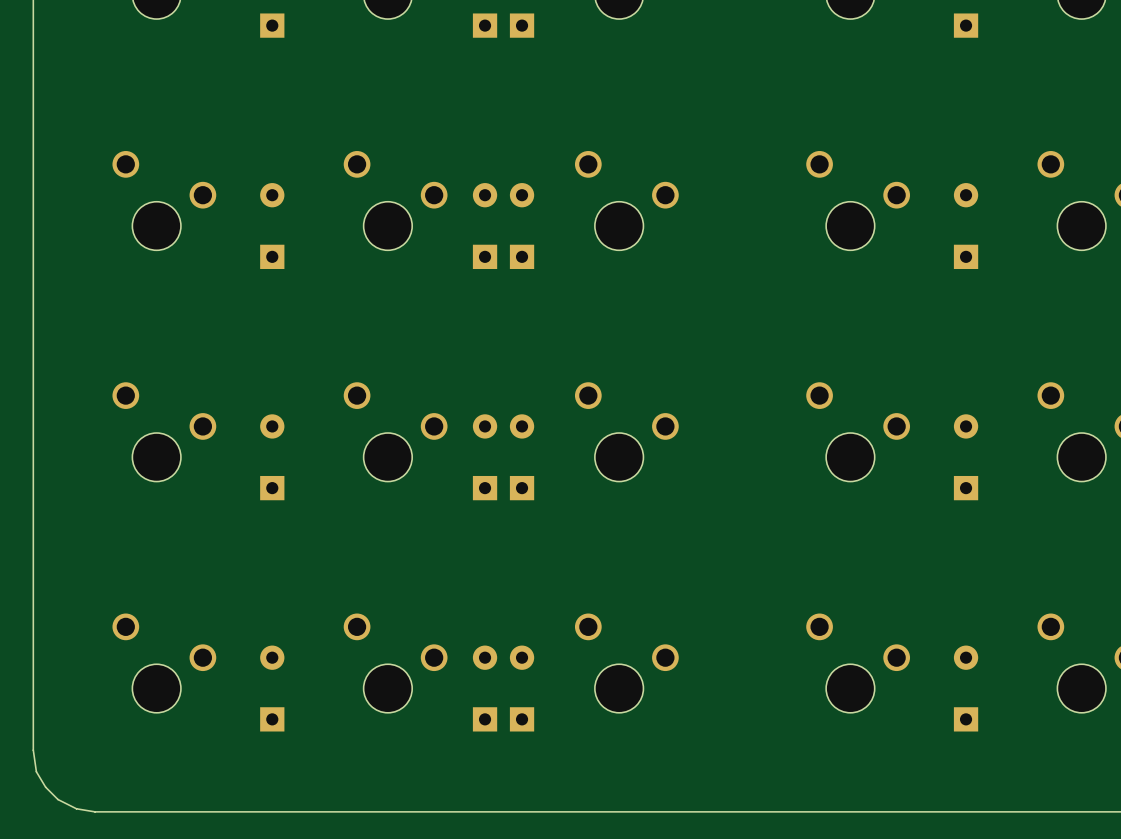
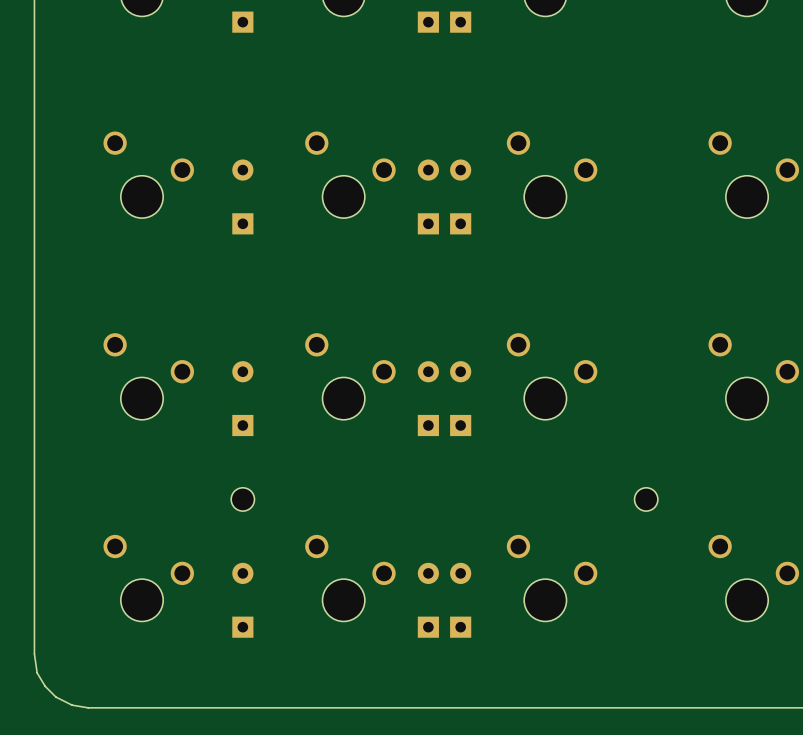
part: none -> (242, 499)
part: none -> (646, 499)

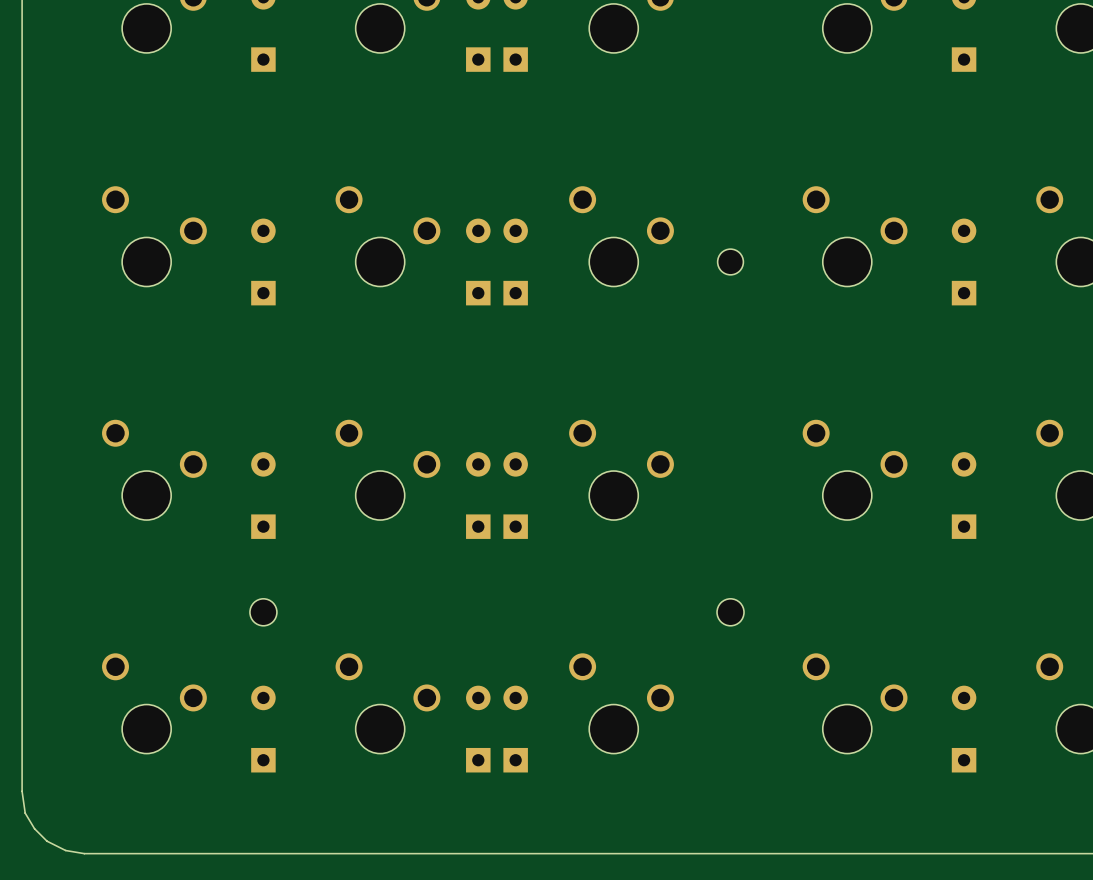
part: none -> (730, 261)

